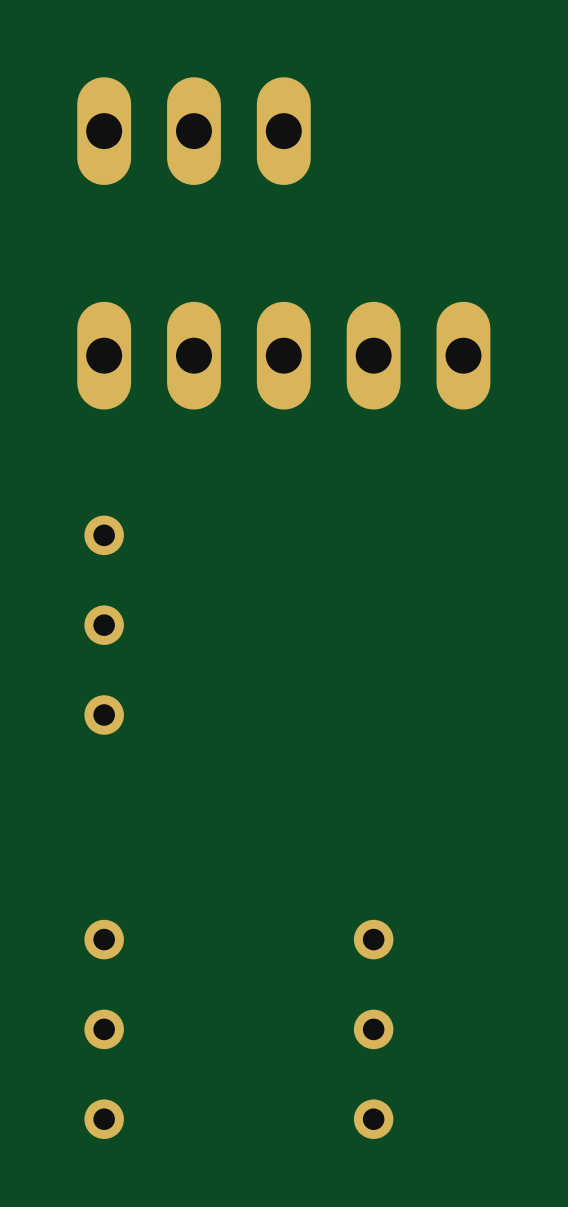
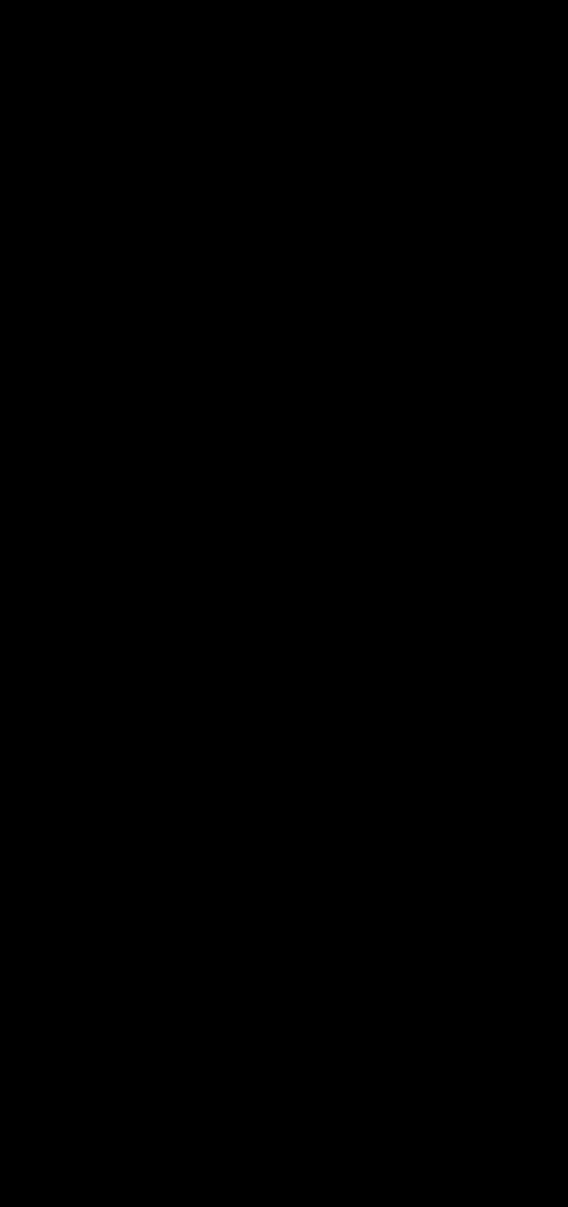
part: (193, 131) -> none
part: (283, 355) -> none
part: (104, 625) -> none
part: (104, 1029) -> none
part: (373, 1029) -> none

